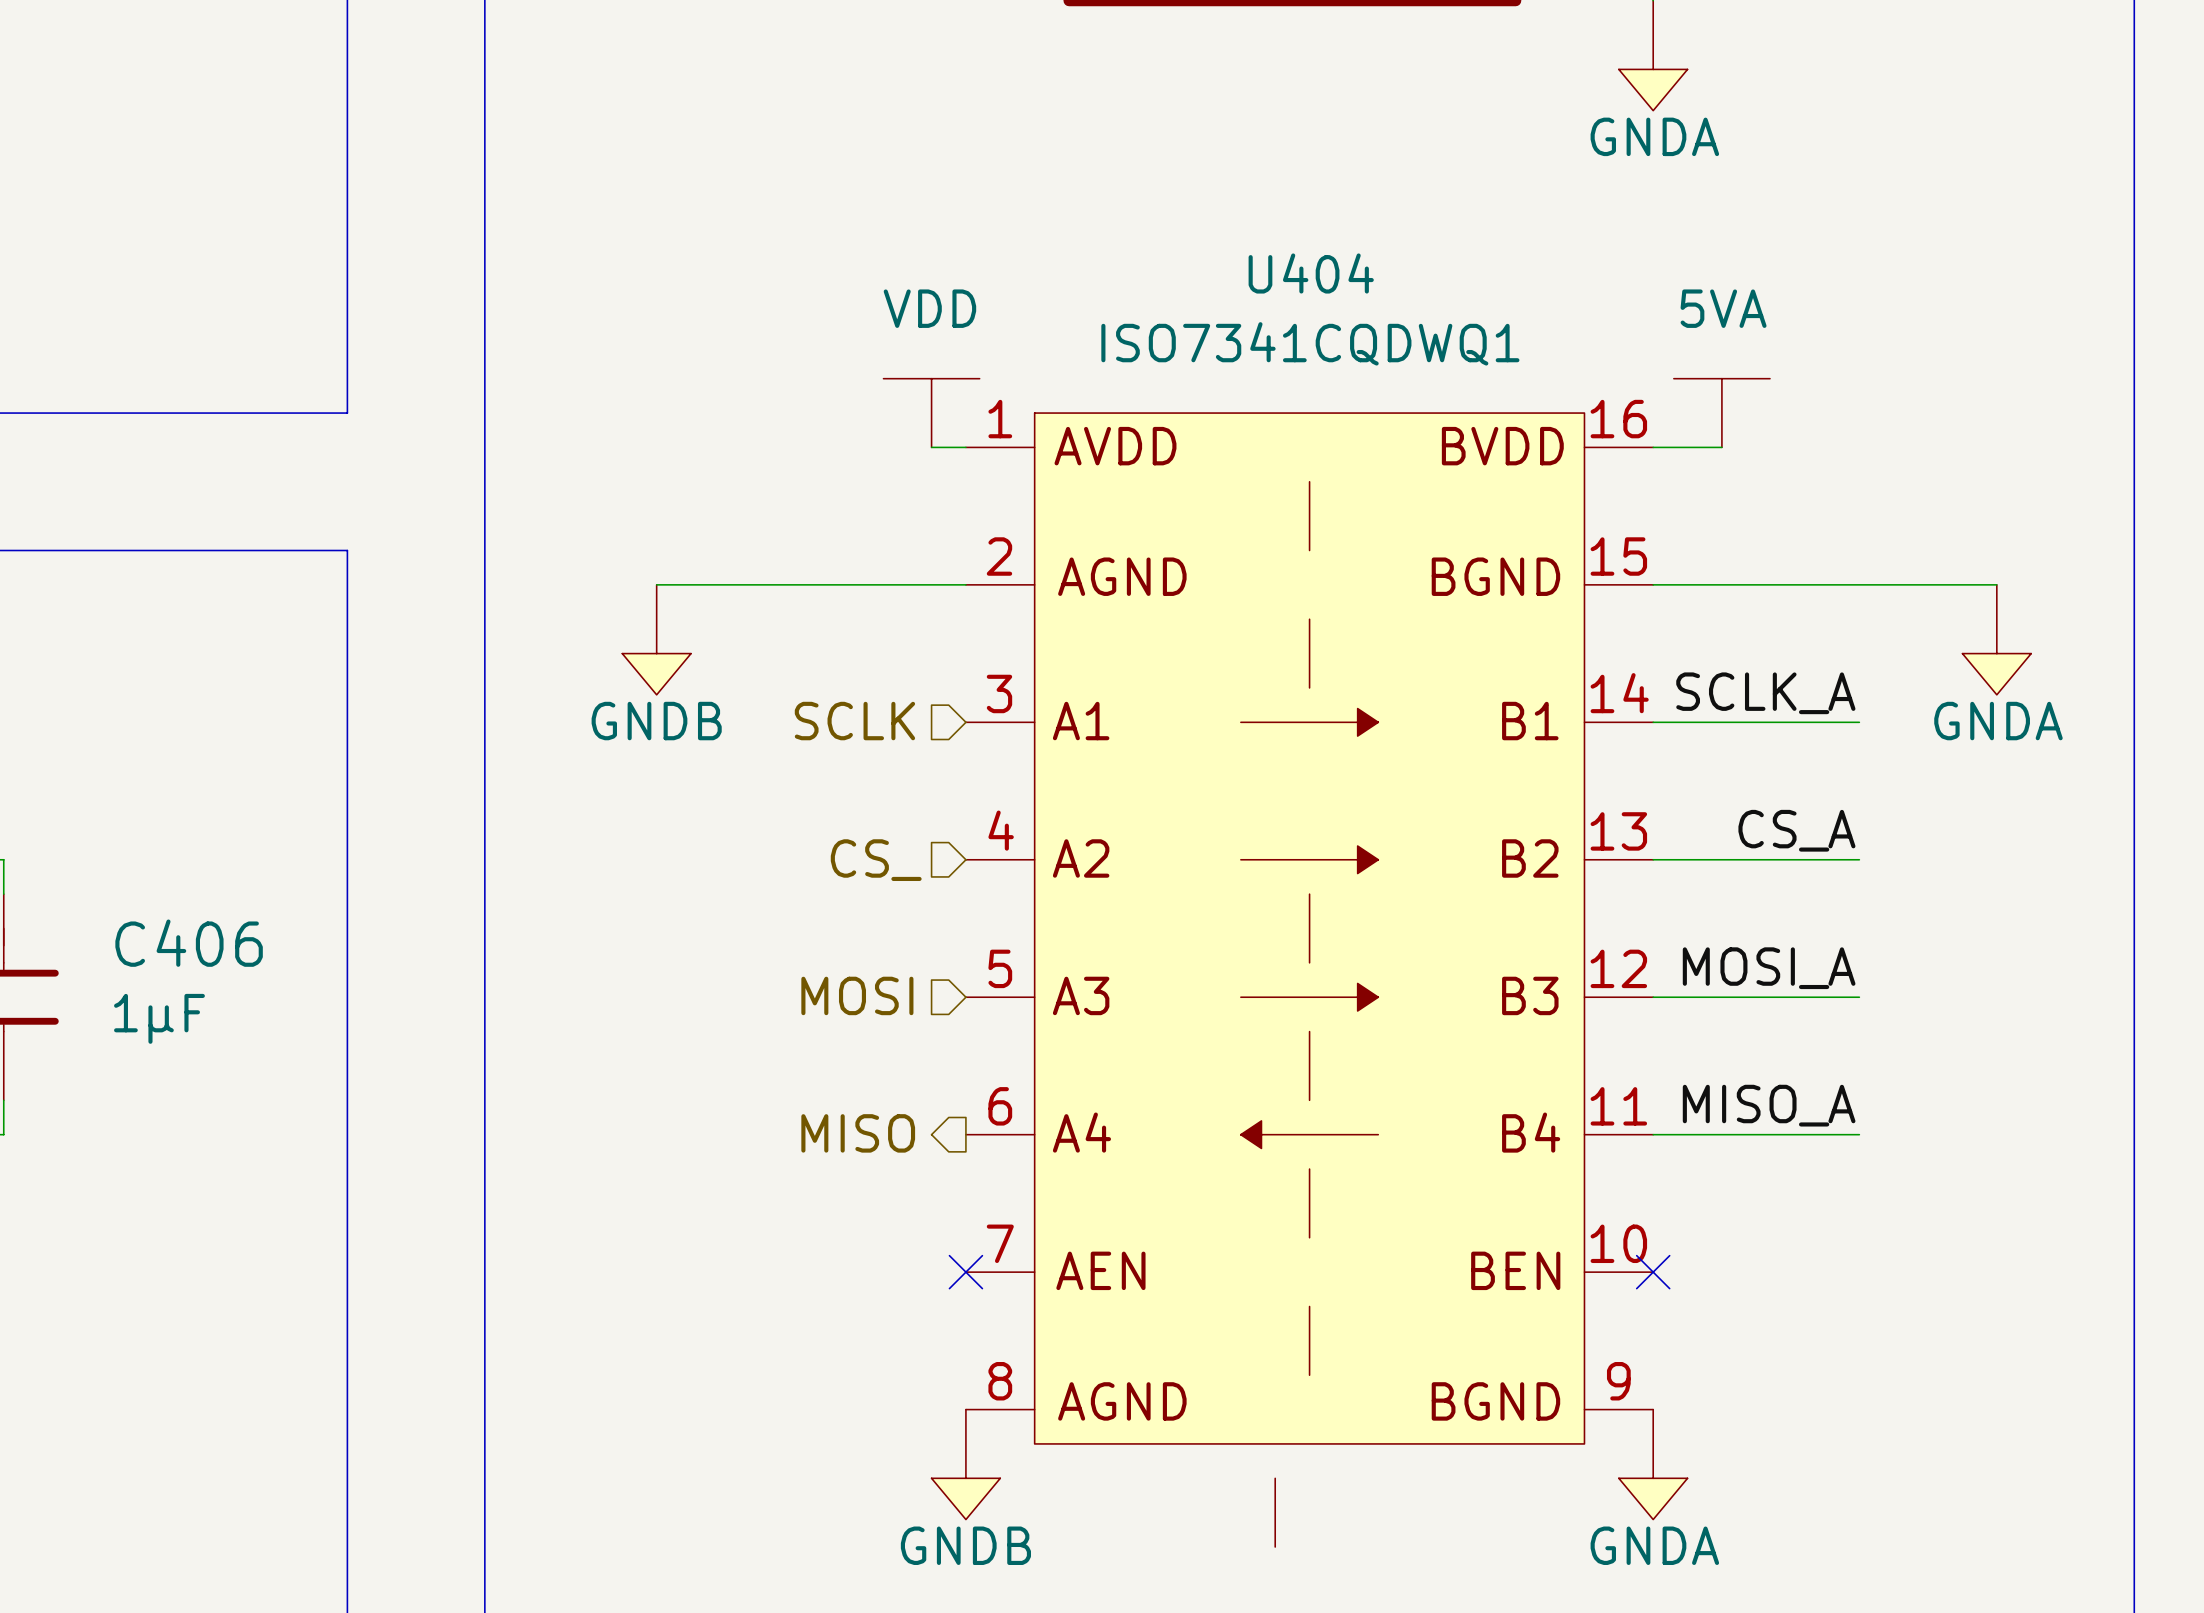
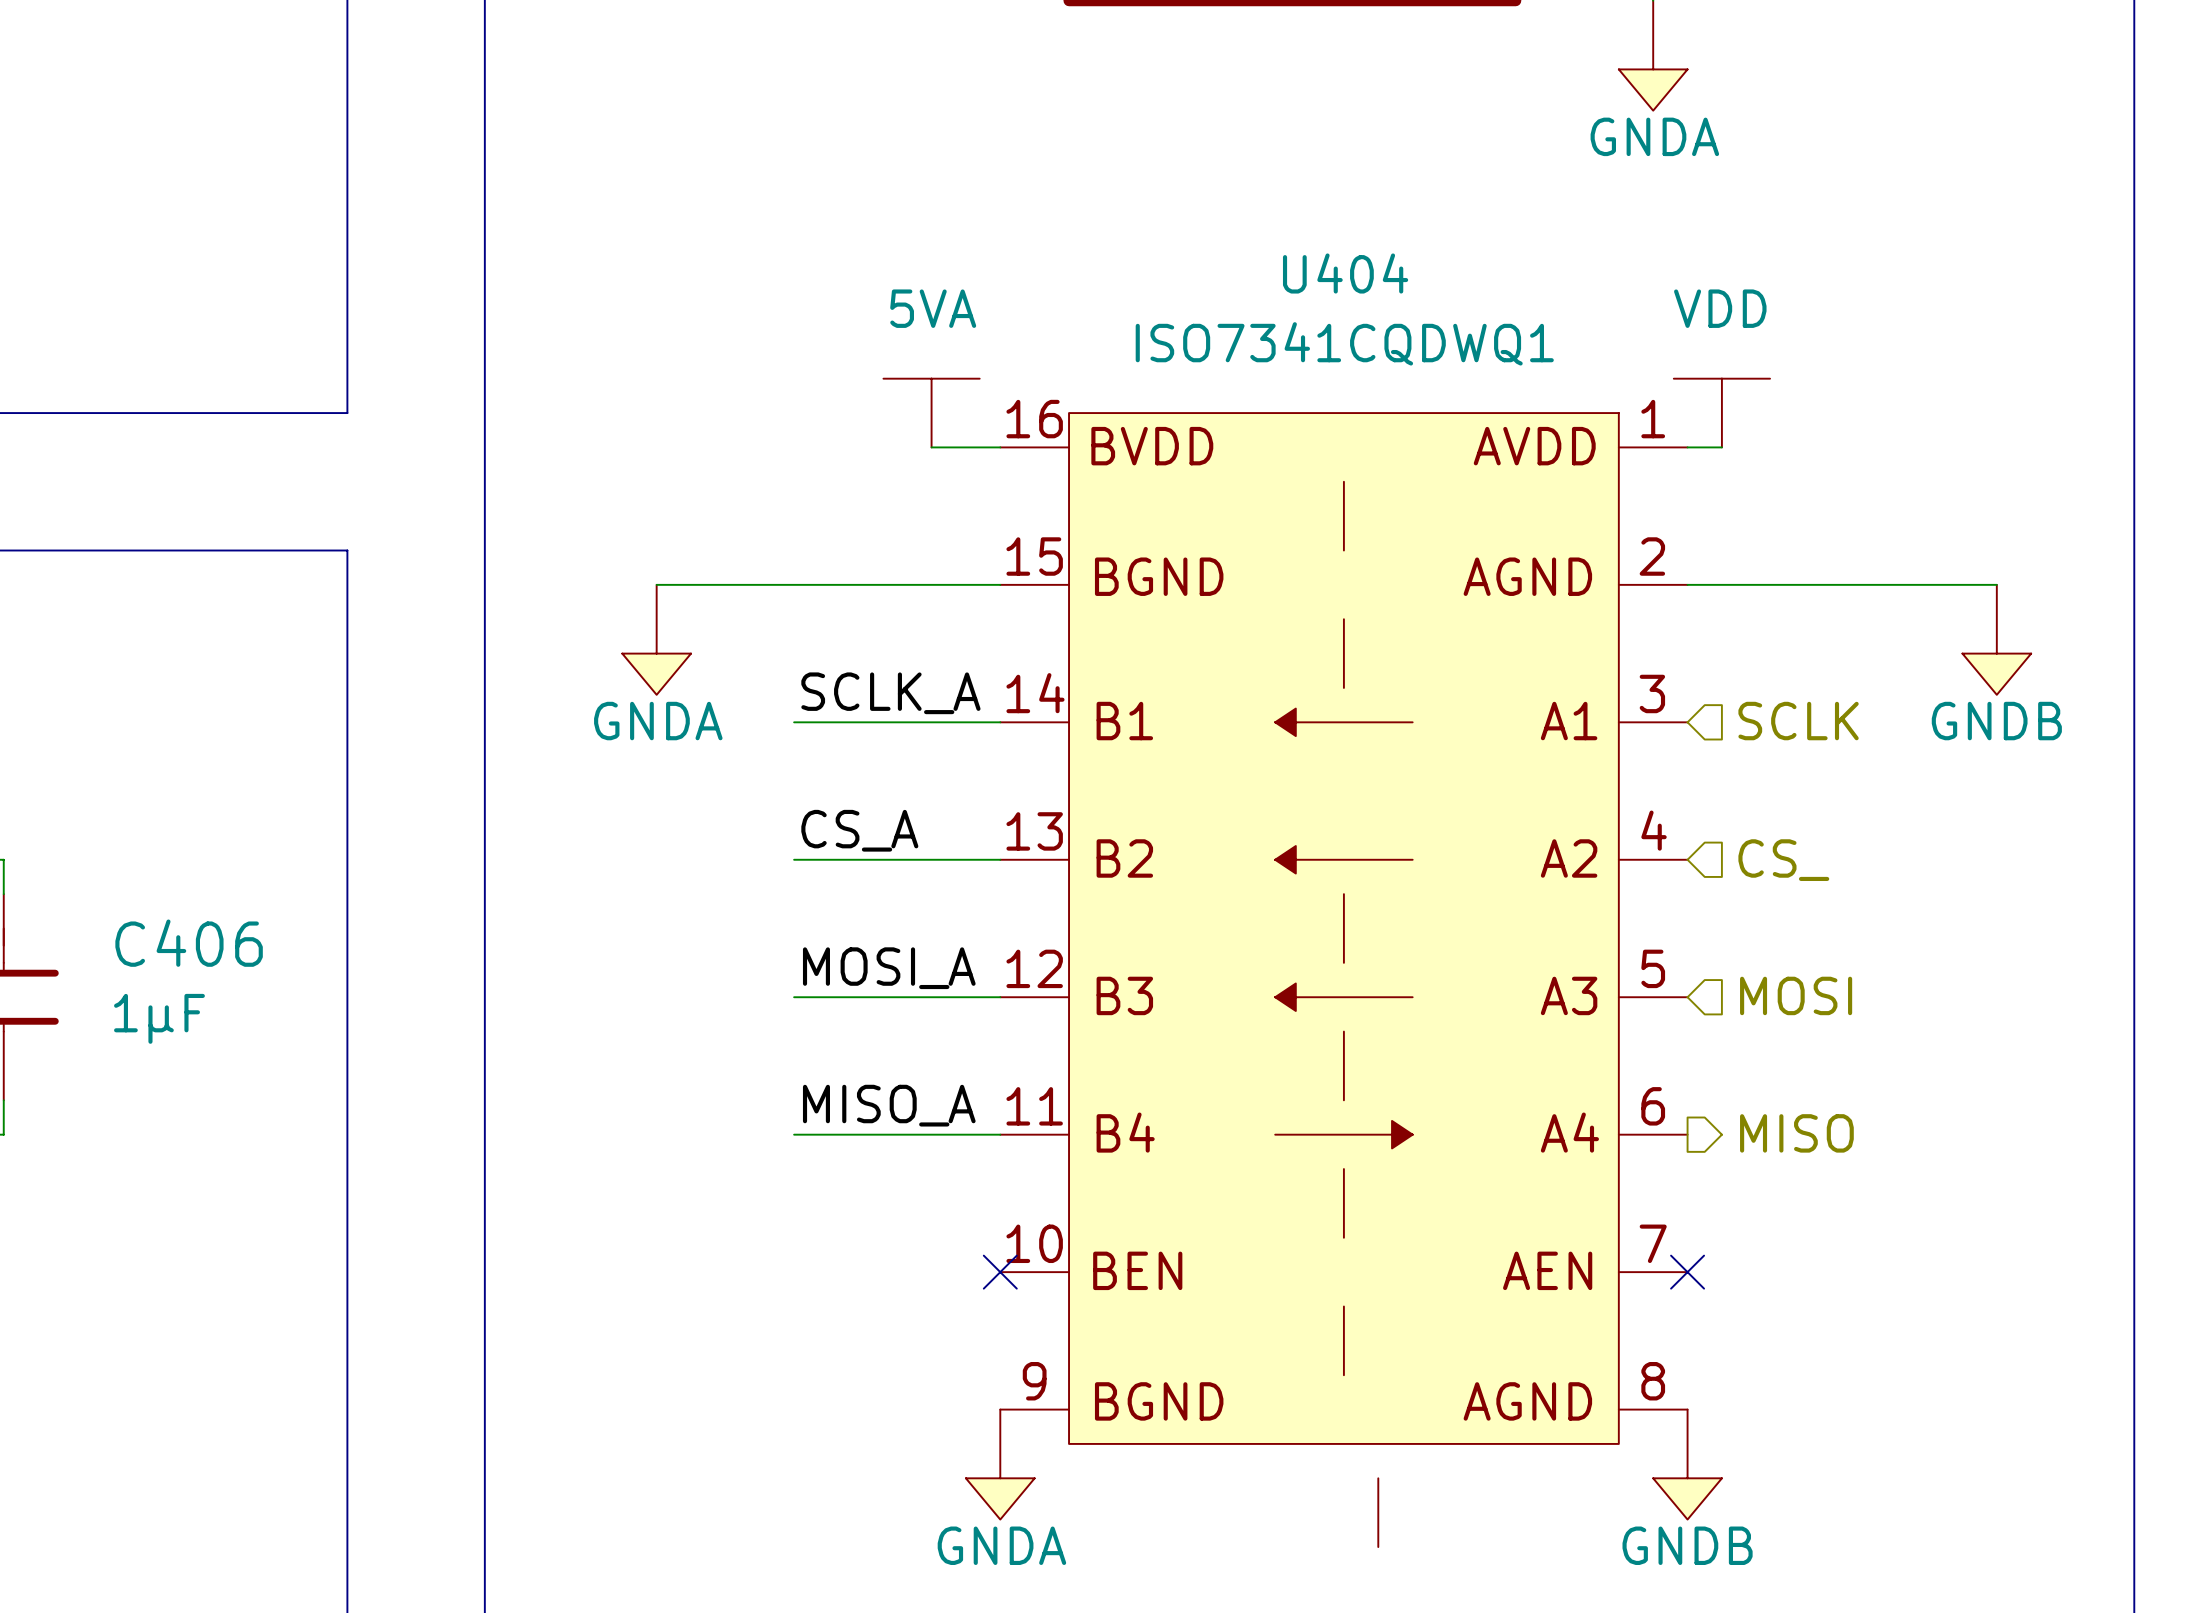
power symbol: VDD (931, 413) -> 5VA (931, 413)
power symbol: 5VA (1721, 413) -> VDD (1721, 413)
power symbol: GNDB (656, 639) -> GNDA (656, 639)
power symbol: GNDA (1996, 639) -> GNDB (1996, 639)
label: none -> SCLK_A (890, 693)
label: SCLK_A (1765, 693) -> none
hierarchical label: SCLK (854, 721) -> none
hierarchical label: none -> SCLK (1798, 721)
wire: none -> (794, 722) (1000, 722)
wire: (1653, 722) (1859, 722) -> none
label: none -> CS_A (859, 830)
label: CS_A (1796, 830) -> none
wire: none -> (794, 859) (1000, 859)
wire: (1653, 859) (1859, 859) -> none
hierarchical label: CS_ (876, 860) -> none
hierarchical label: none -> CS_ (1783, 860)
label: none -> MOSI_A (889, 968)
label: MOSI_A (1769, 968) -> none
U404 flip: as is (1309, 980) -> left-right (1343, 980)
hierarchical label: MOSI (857, 995) -> none
hierarchical label: none -> MOSI (1796, 995)
wire: none -> (794, 997) (1000, 997)
wire: (1653, 997) (1859, 997) -> none
label: none -> MISO_A (889, 1105)
label: MISO_A (1769, 1105) -> none
hierarchical label: MISO (858, 1133) -> none
hierarchical label: none -> MISO (1796, 1133)
wire: none -> (794, 1134) (1000, 1134)
wire: (1653, 1134) (1859, 1134) -> none
no-connect mark position: (965, 1272) -> (1000, 1272)
no-connect mark position: (1653, 1272) -> (1687, 1272)
power symbol: GNDB (965, 1464) -> none
power symbol position: GNDA (1653, 1464) -> GNDA (1000, 1464)
power symbol: none -> GNDB (1687, 1464)

